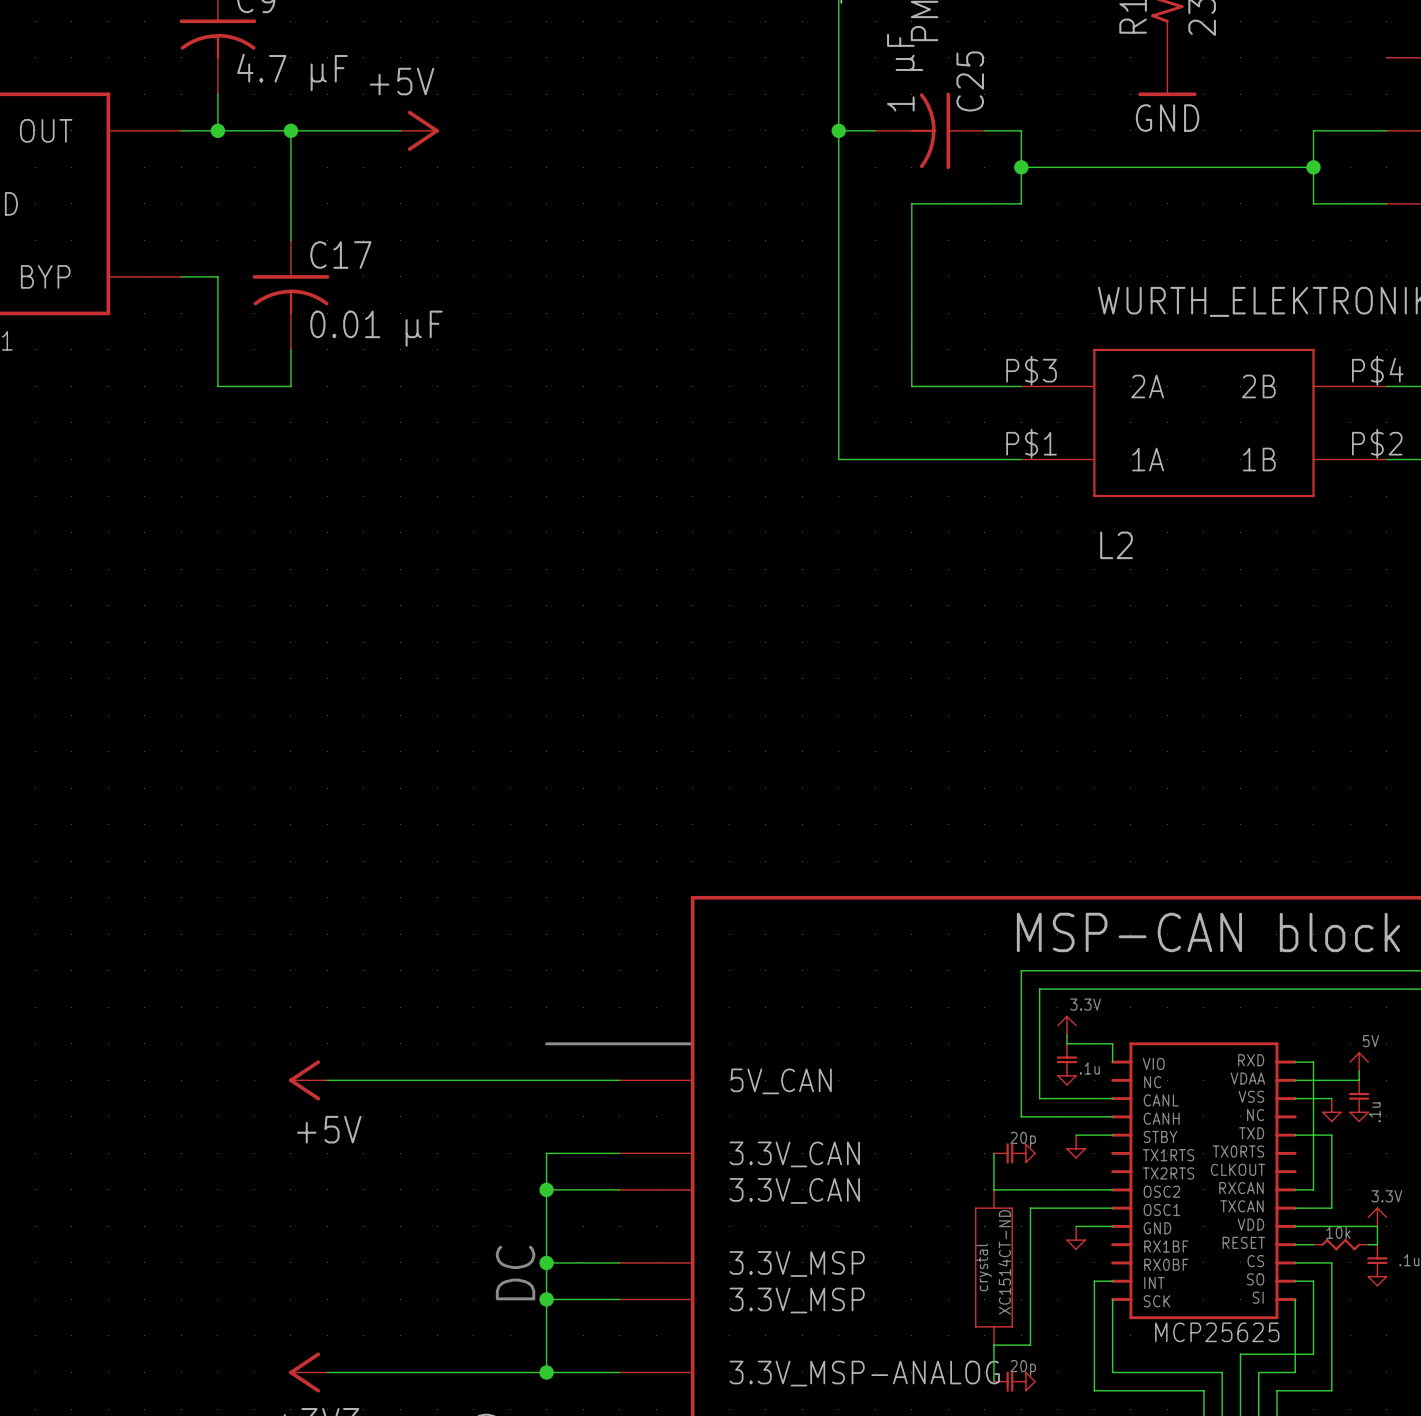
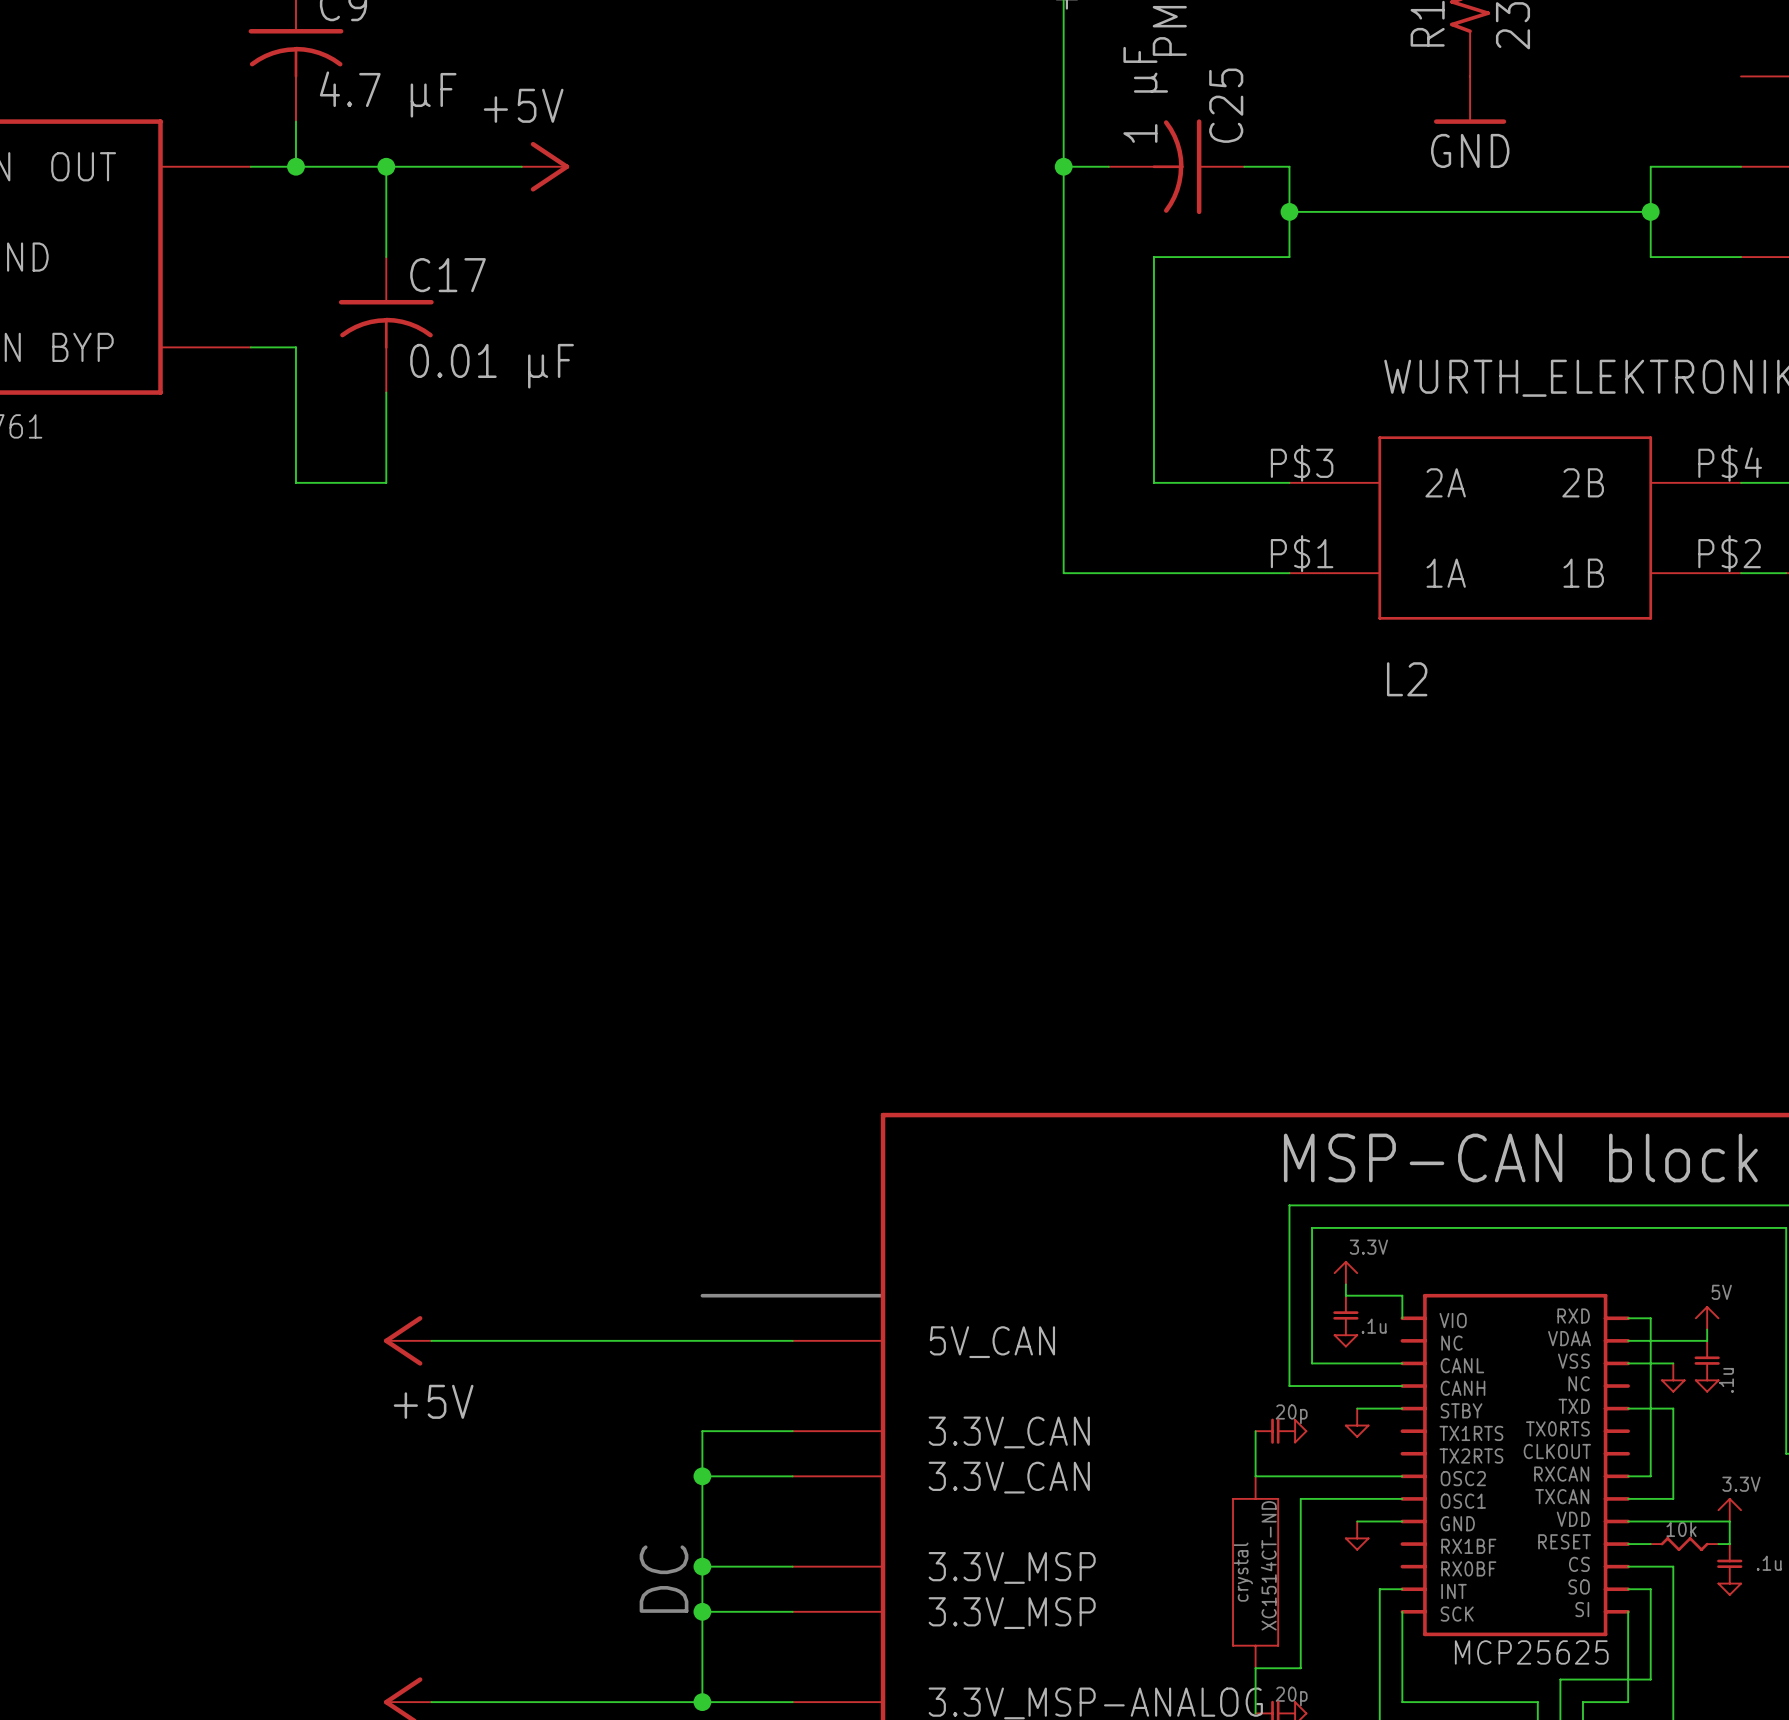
C17 position: (290, 295) -> (386, 324)

